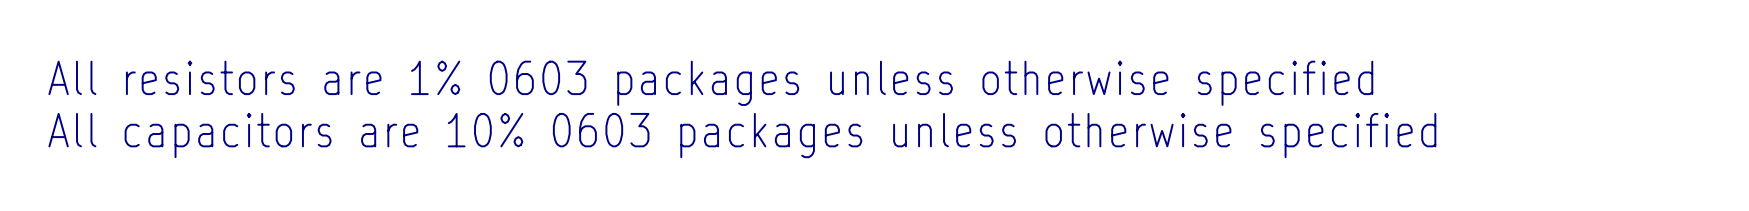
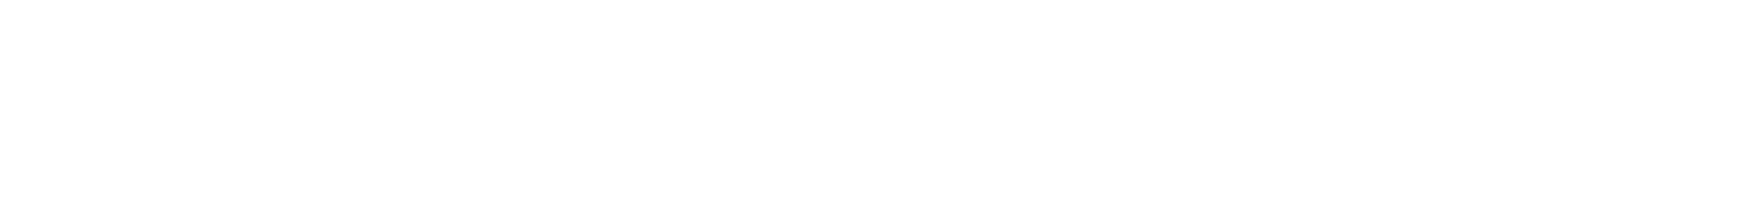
text: All resistors are 1% 0603 packages unless otherwise specified (710, 83) -> none
text: All capacitors are 10% 0603 packages unless otherwise specified (742, 135) -> none

